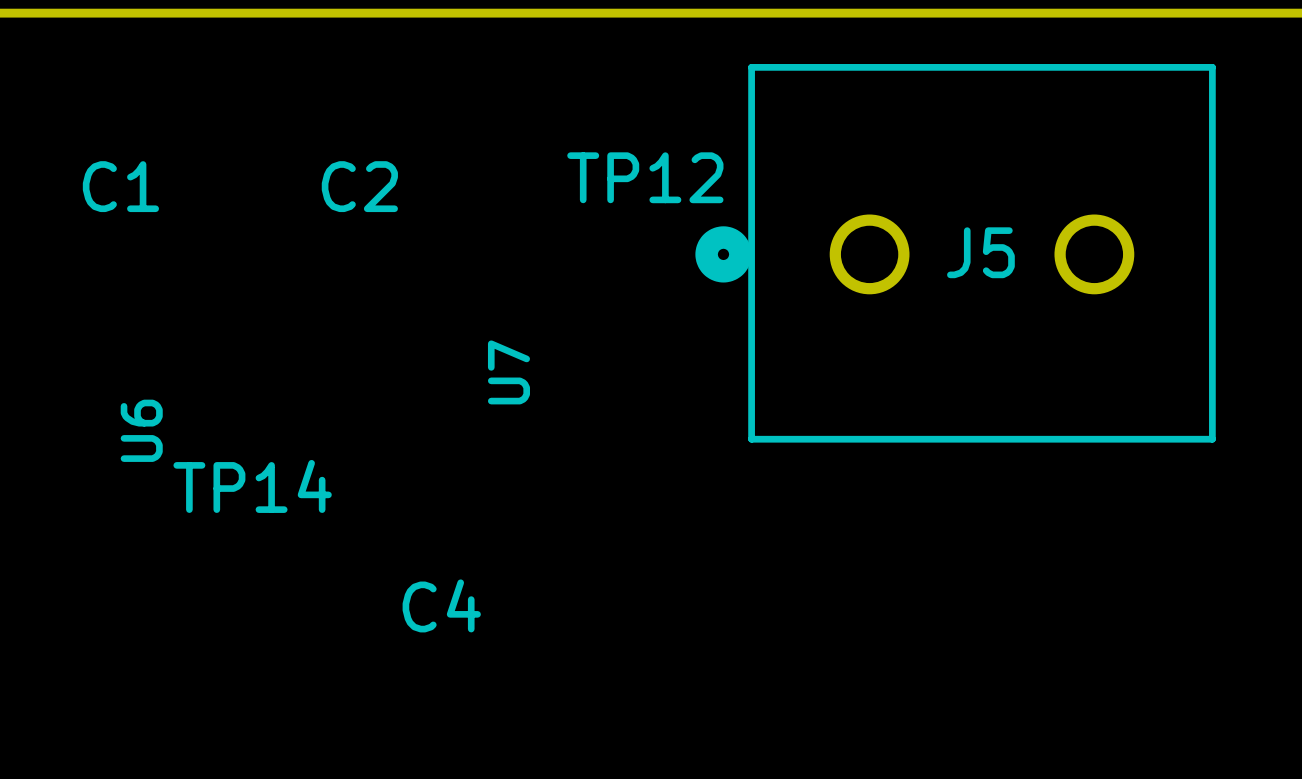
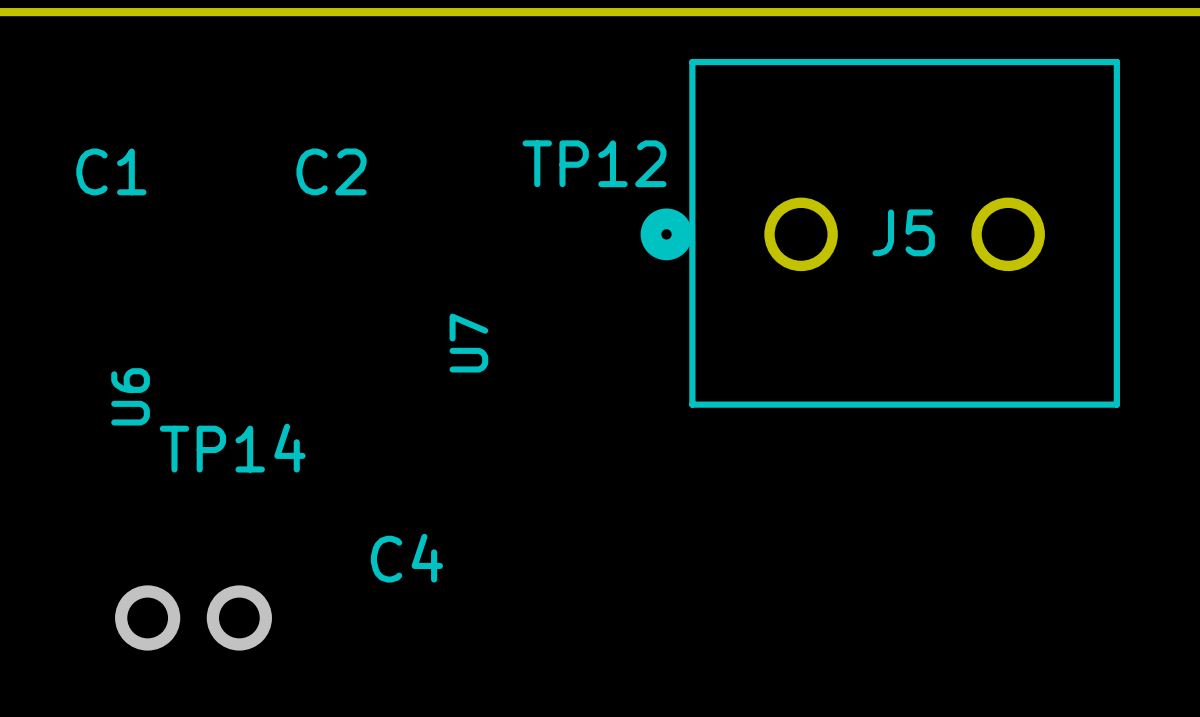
via: none -> (147, 617)
via: none -> (239, 617)

